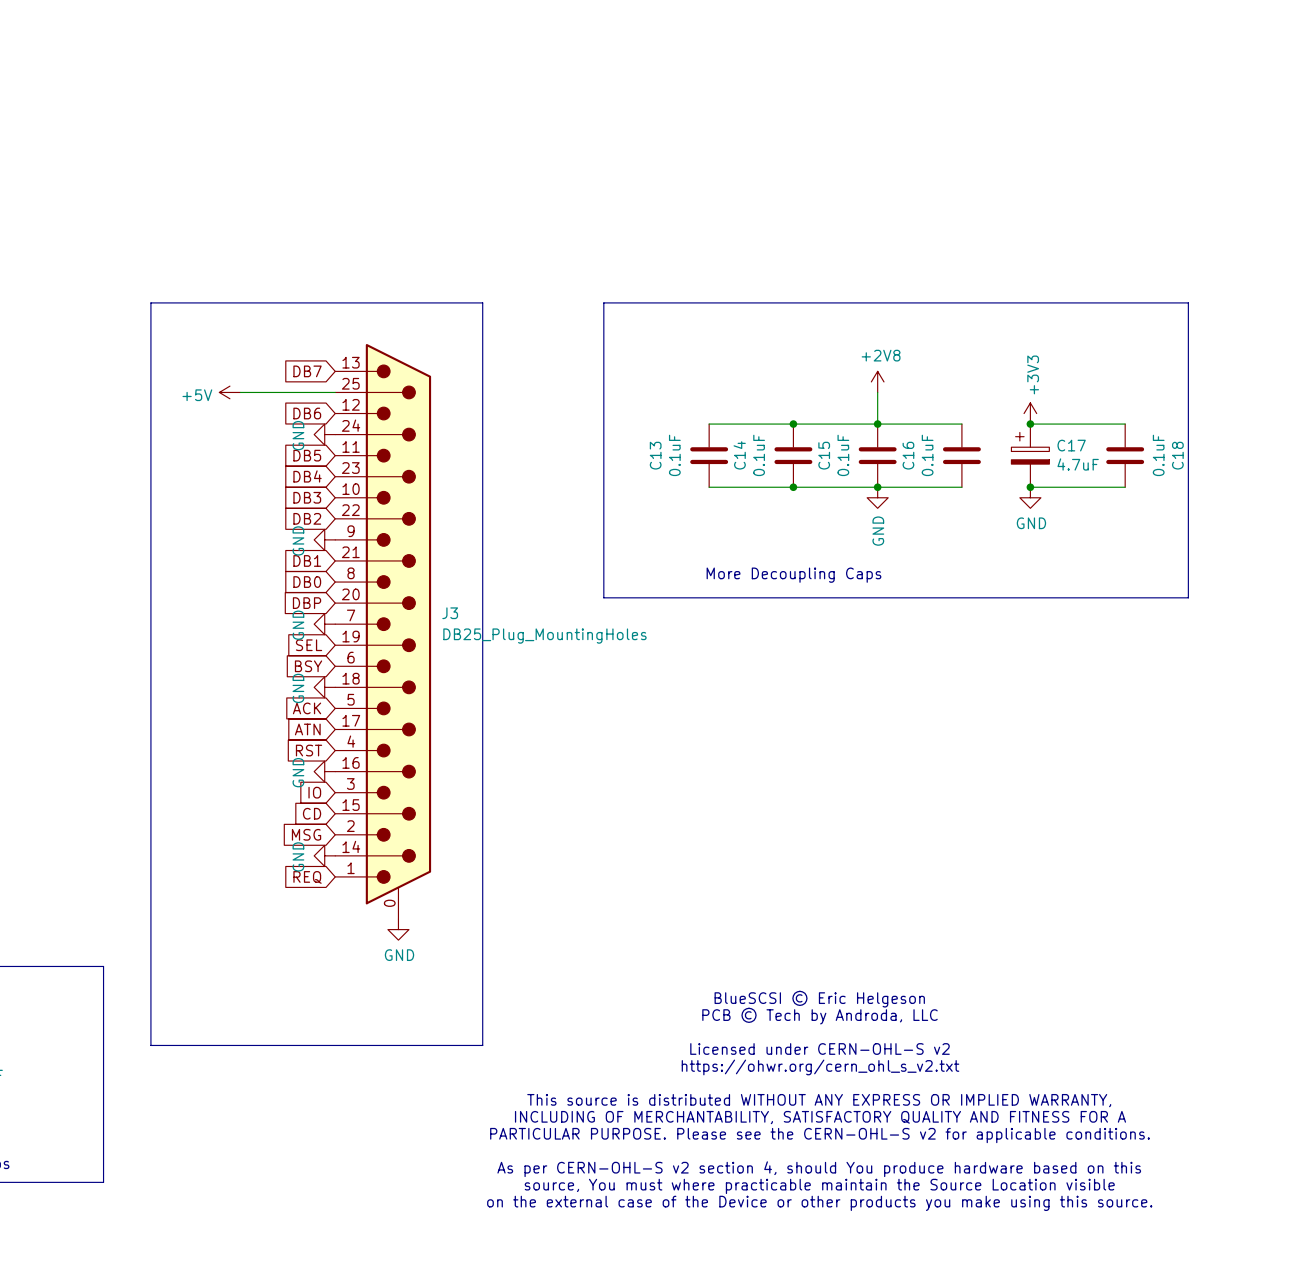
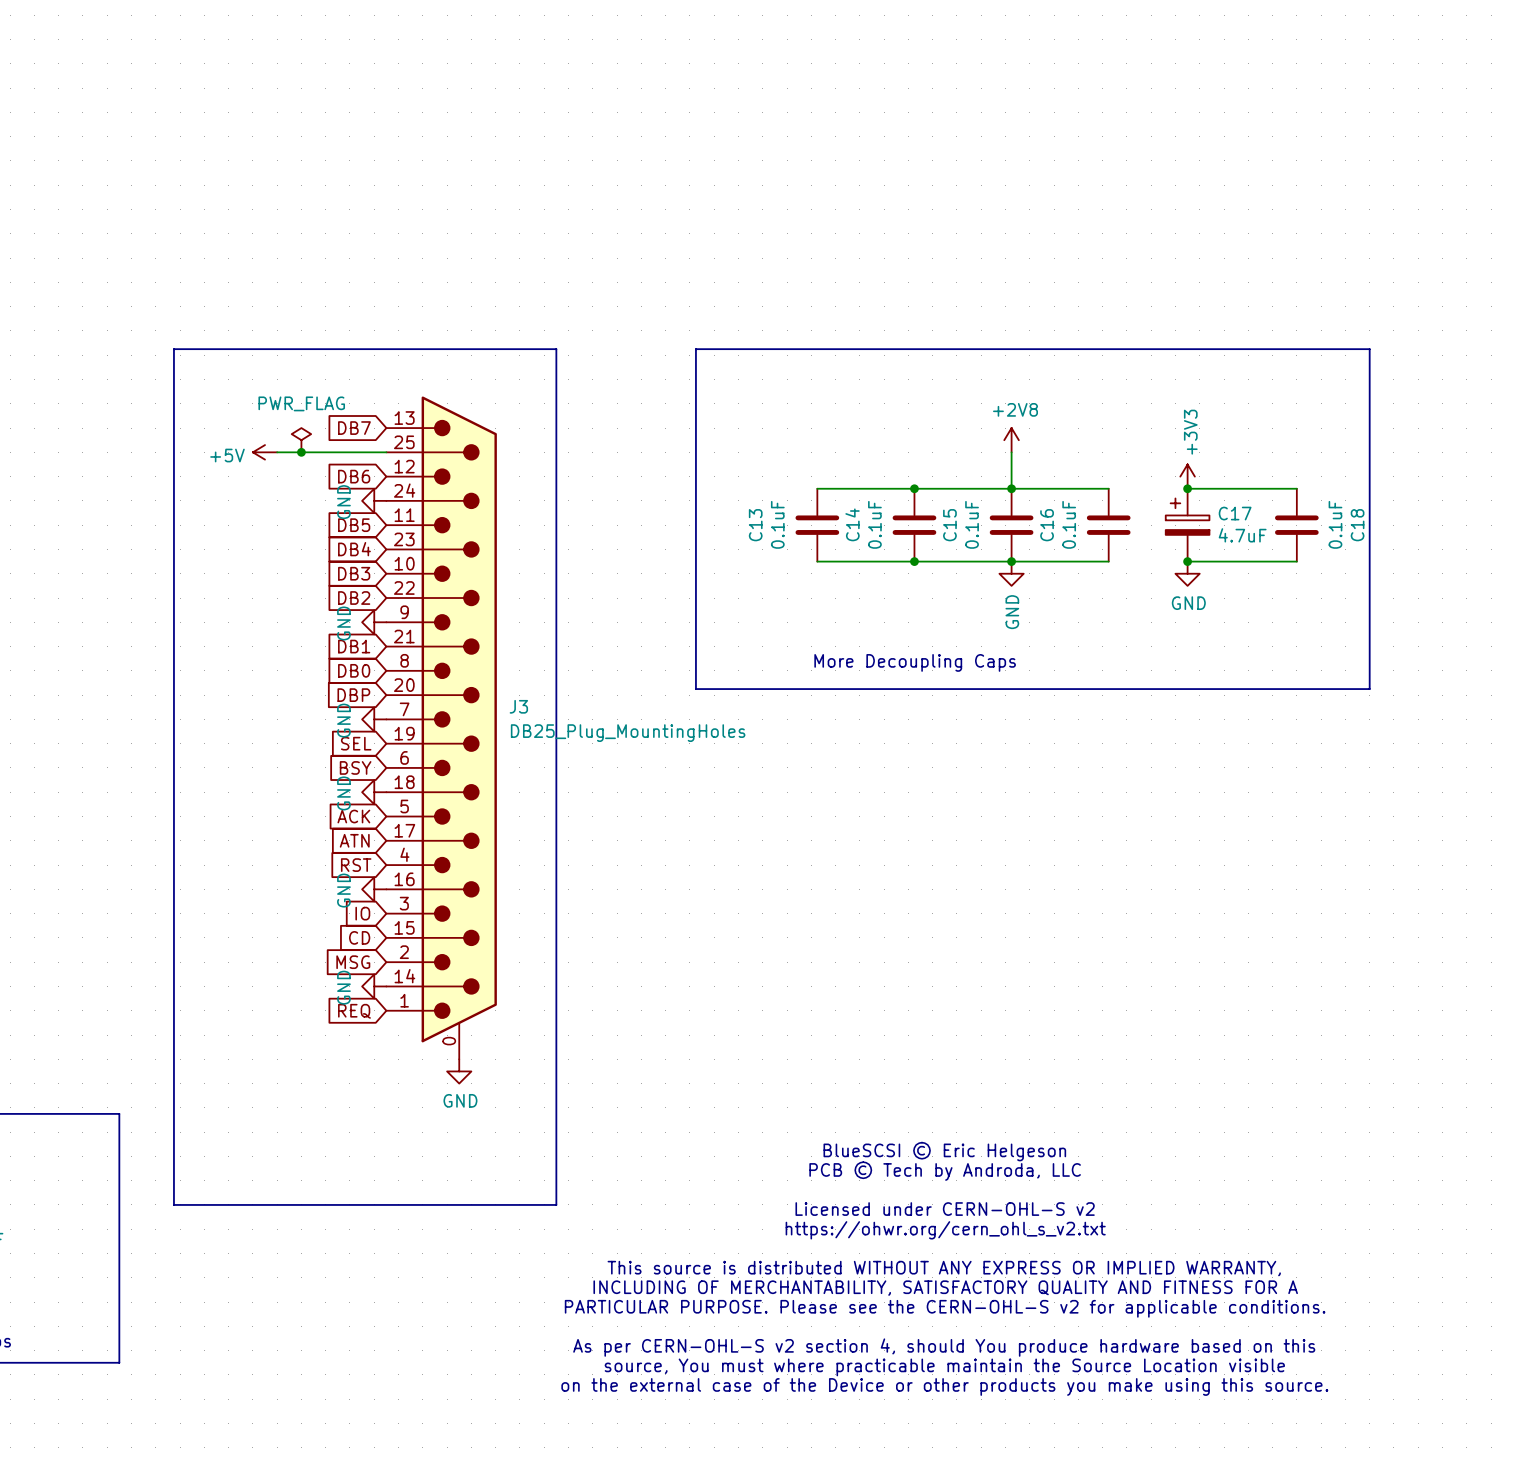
power symbol: none -> PWR_FLAG (301, 440)
junction: none -> (301, 452)

